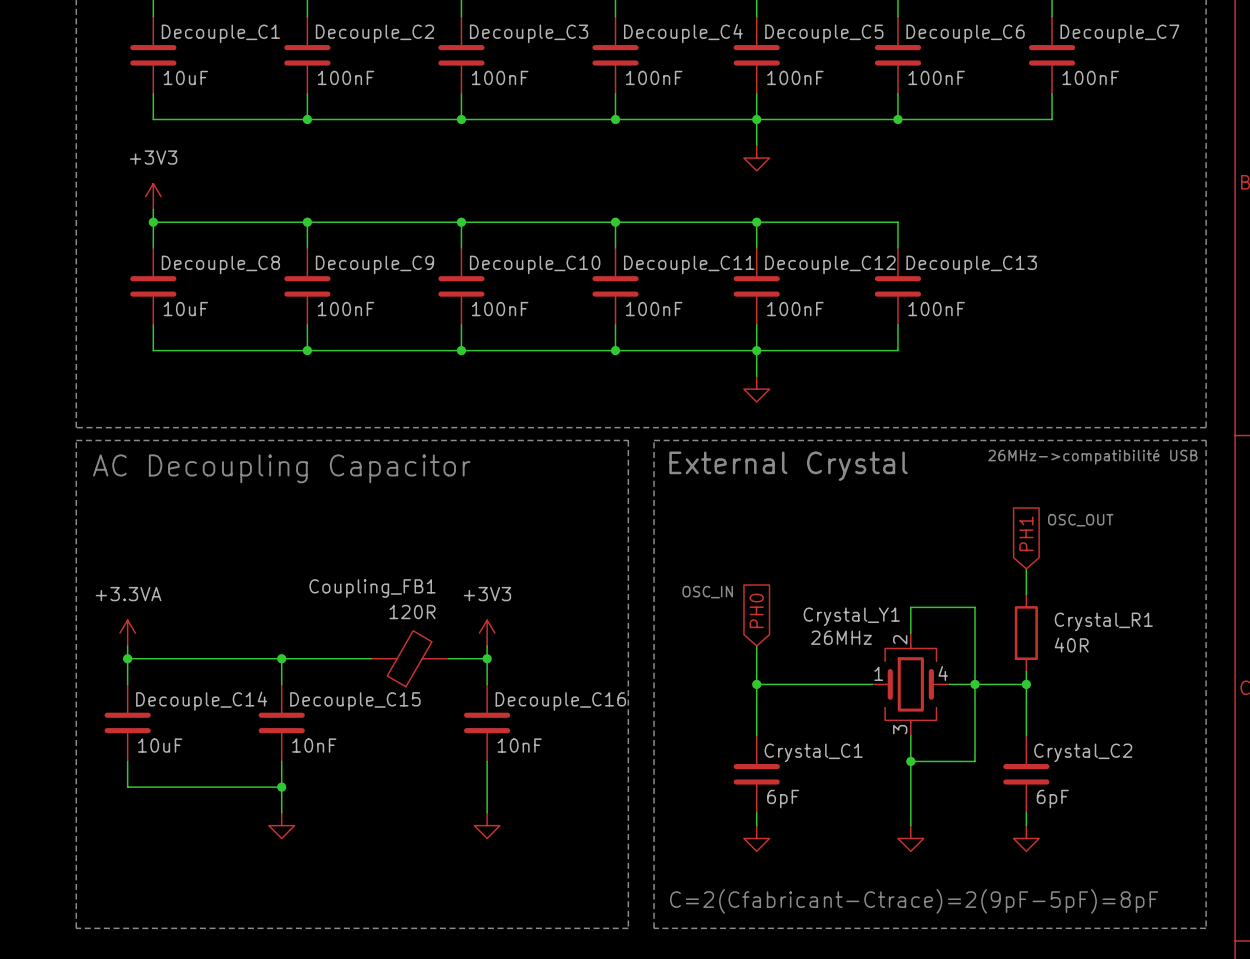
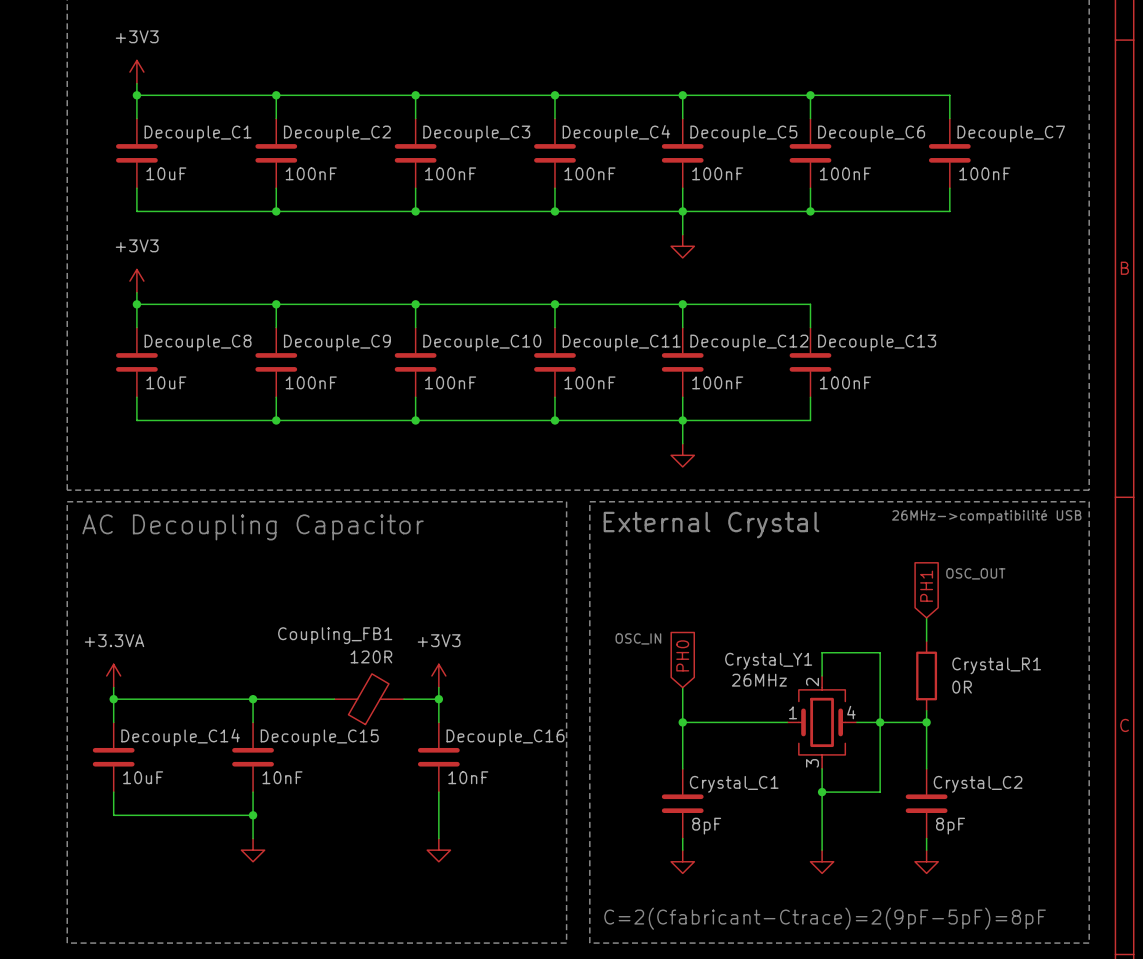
Crystal_R1 value: 40R (1071, 645) -> 0R (962, 687)
Crystal_C1 value: 6pF (783, 799) -> 8pF (706, 826)
Crystal_C2 value: 6pF (1052, 799) -> 8pF (950, 826)

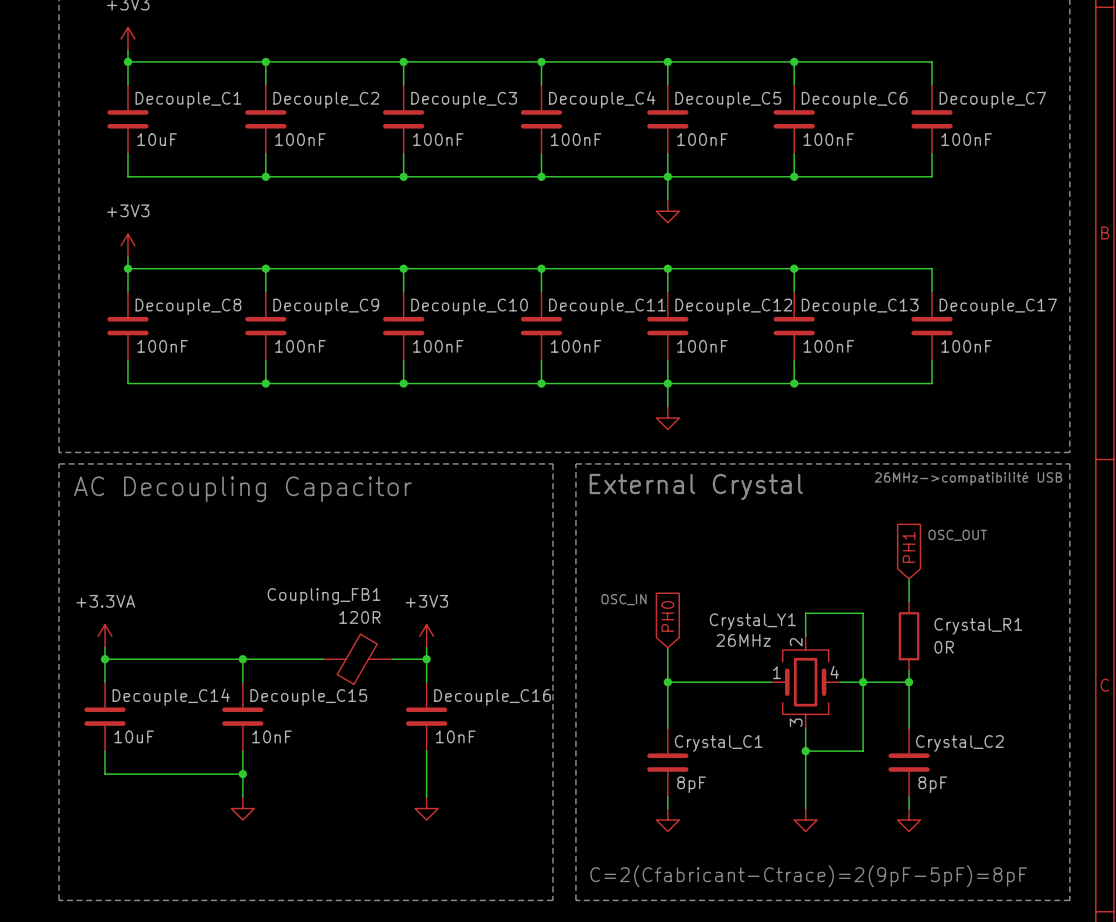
wire: none -> (794, 268) (932, 268) (932, 291)
junction: none -> (794, 268)
Decouple_C17: none -> 100nF (932, 326)
Decouple_C8 value: 10uF (166, 382) -> 100nF (162, 346)
wire: none -> (932, 360) (932, 383) (794, 383)
junction: none -> (794, 383)

